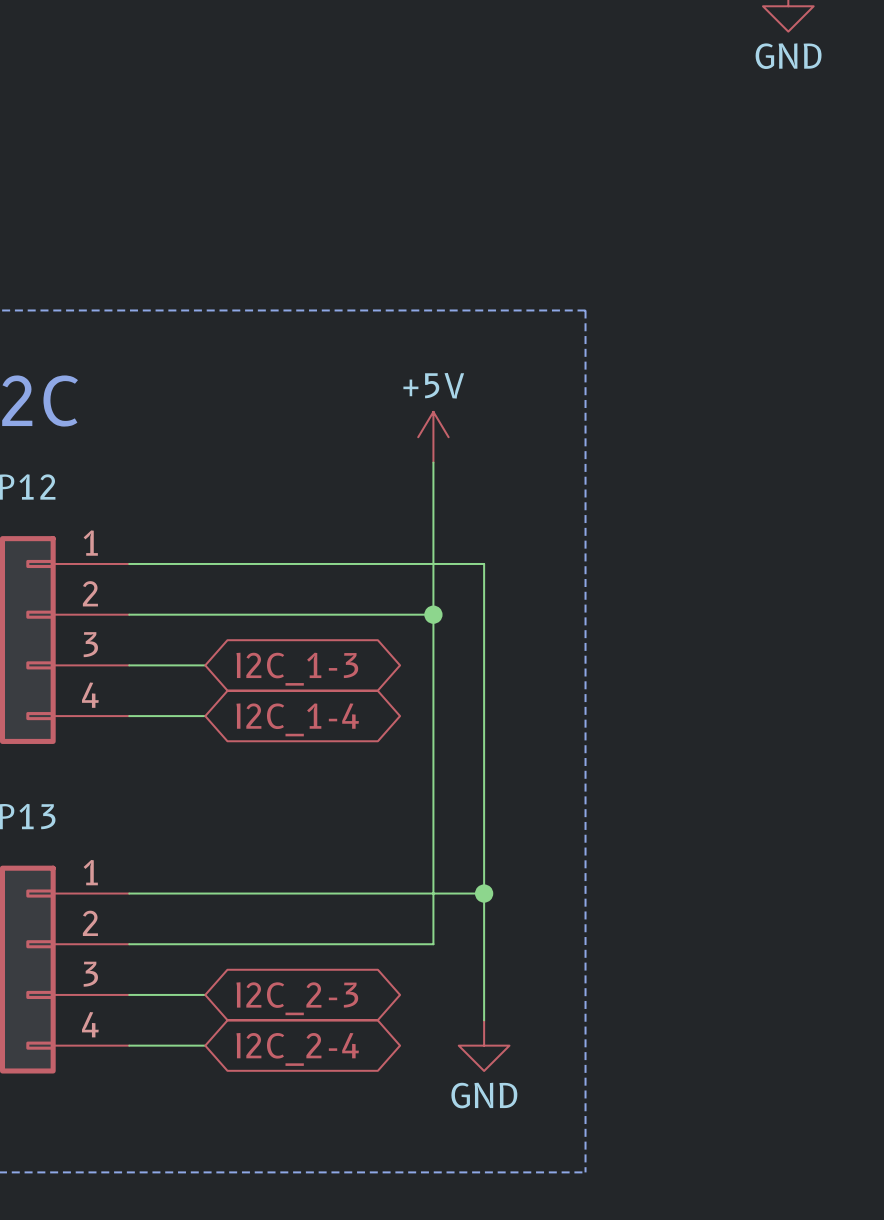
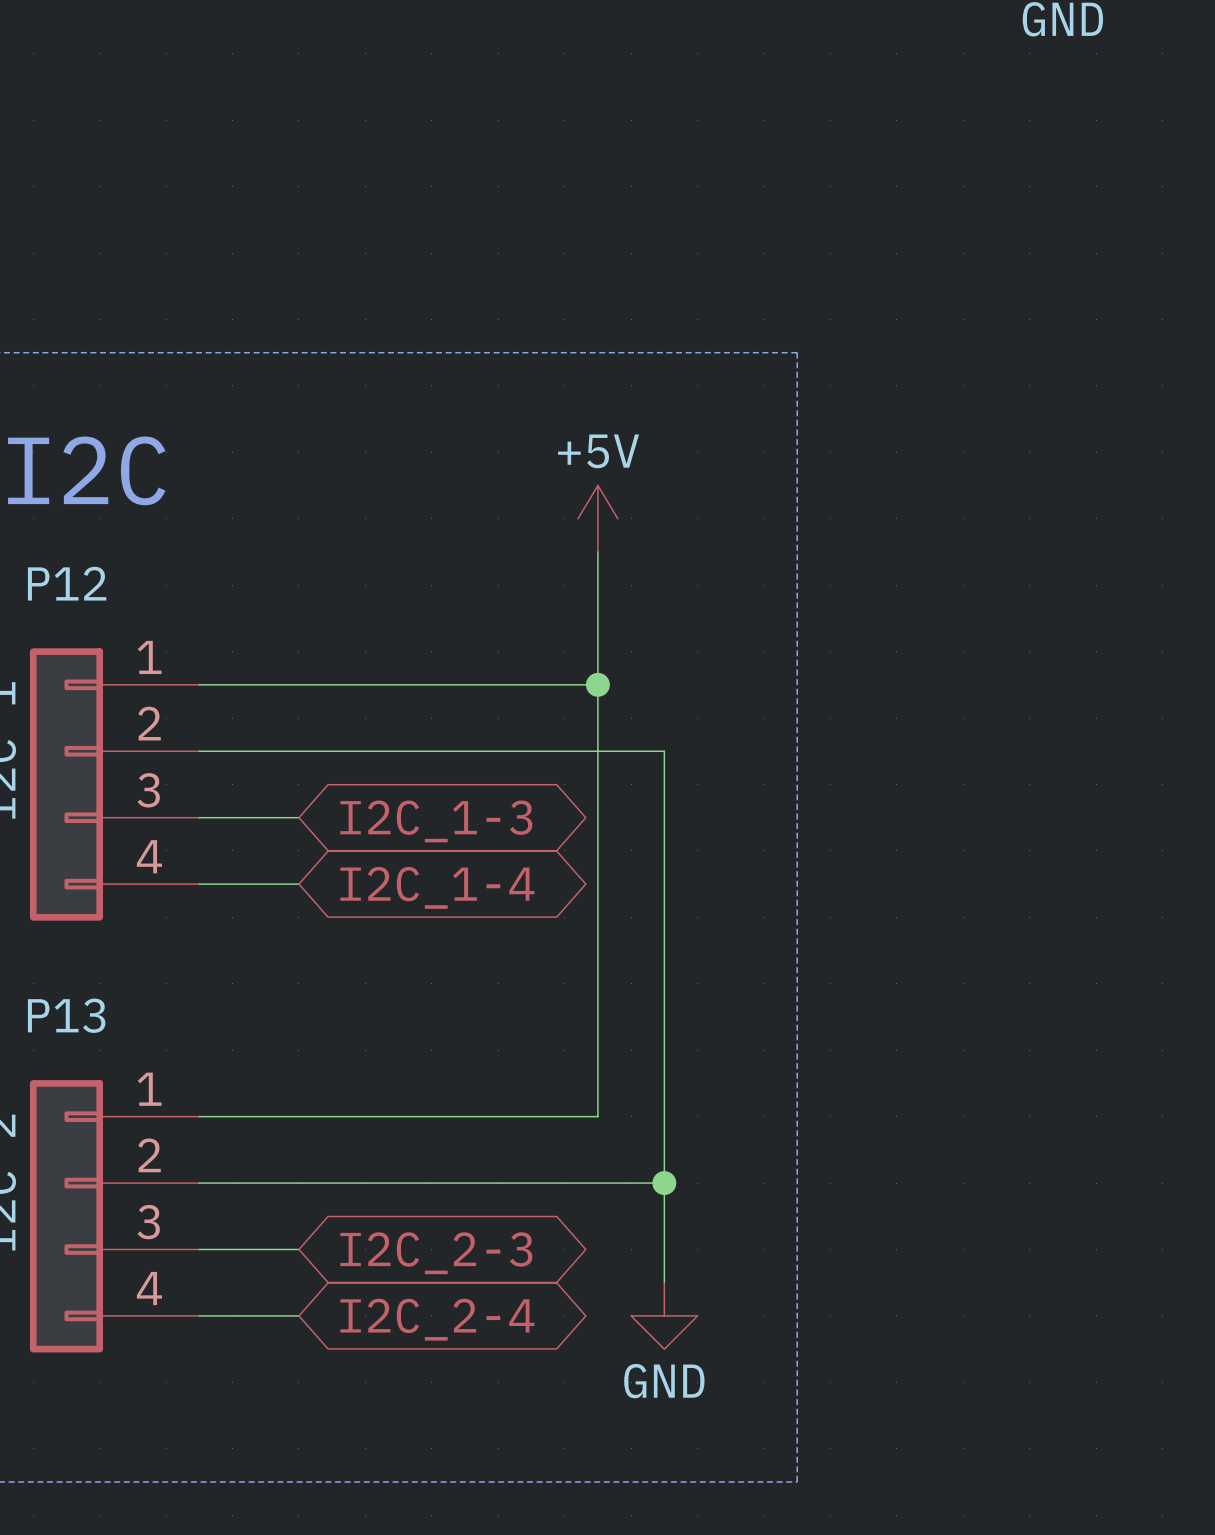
wire: (433, 563) (484, 563) (484, 614) -> (597, 751) (664, 751)
junction position: (433, 614) -> (597, 684)
wire: (484, 893) (433, 893) (433, 944) -> (664, 1183) (597, 1183)
junction position: (484, 893) -> (664, 1183)

